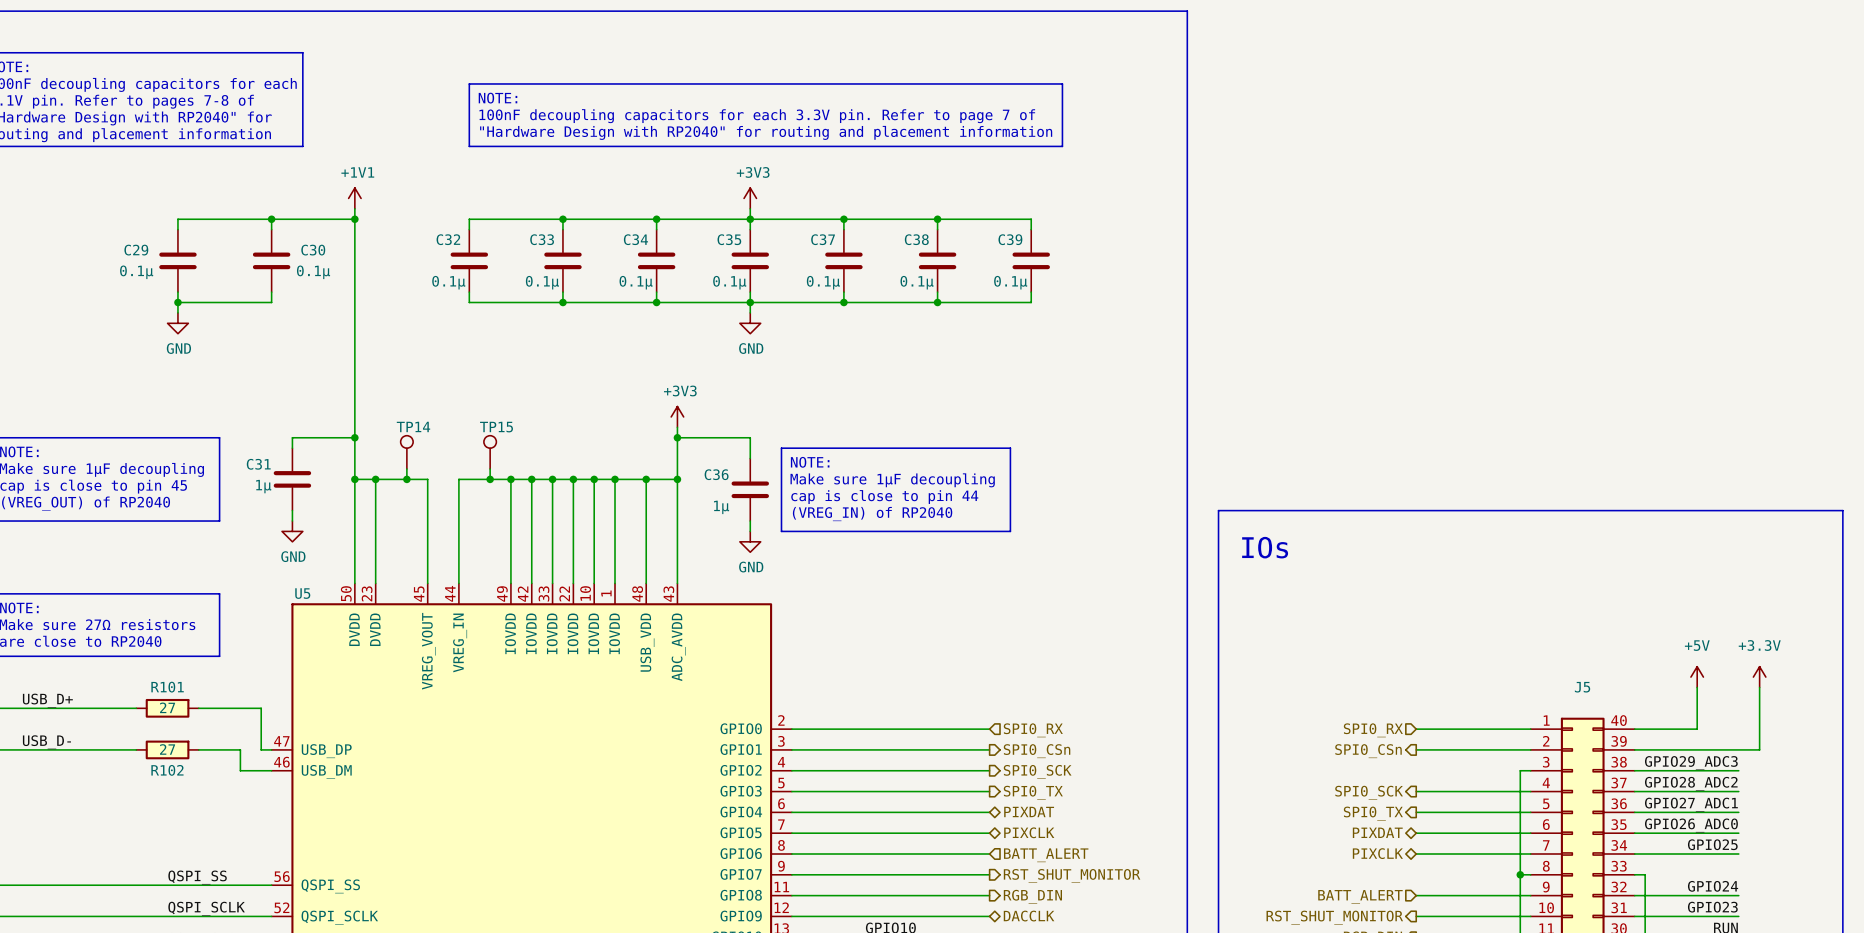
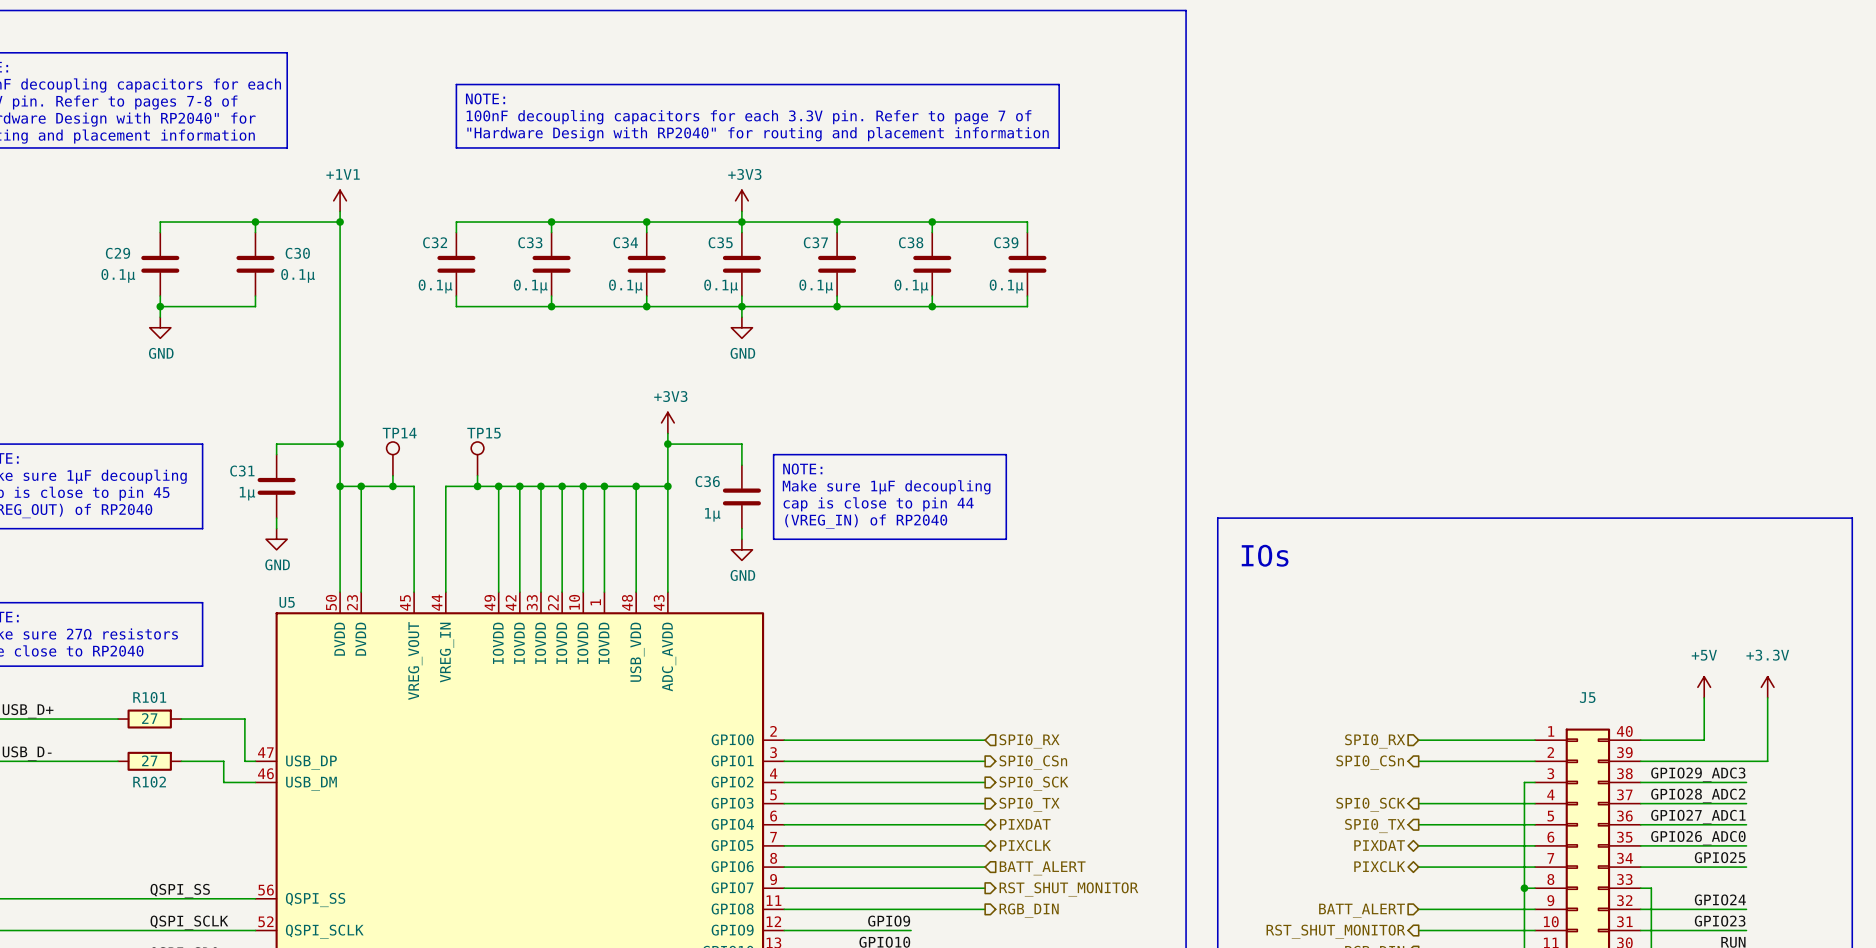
label: none -> GPIO9 (889, 921)
wire: (916, 916) (989, 916) -> none
hierarchical label: DACCLK (1029, 916) -> none

